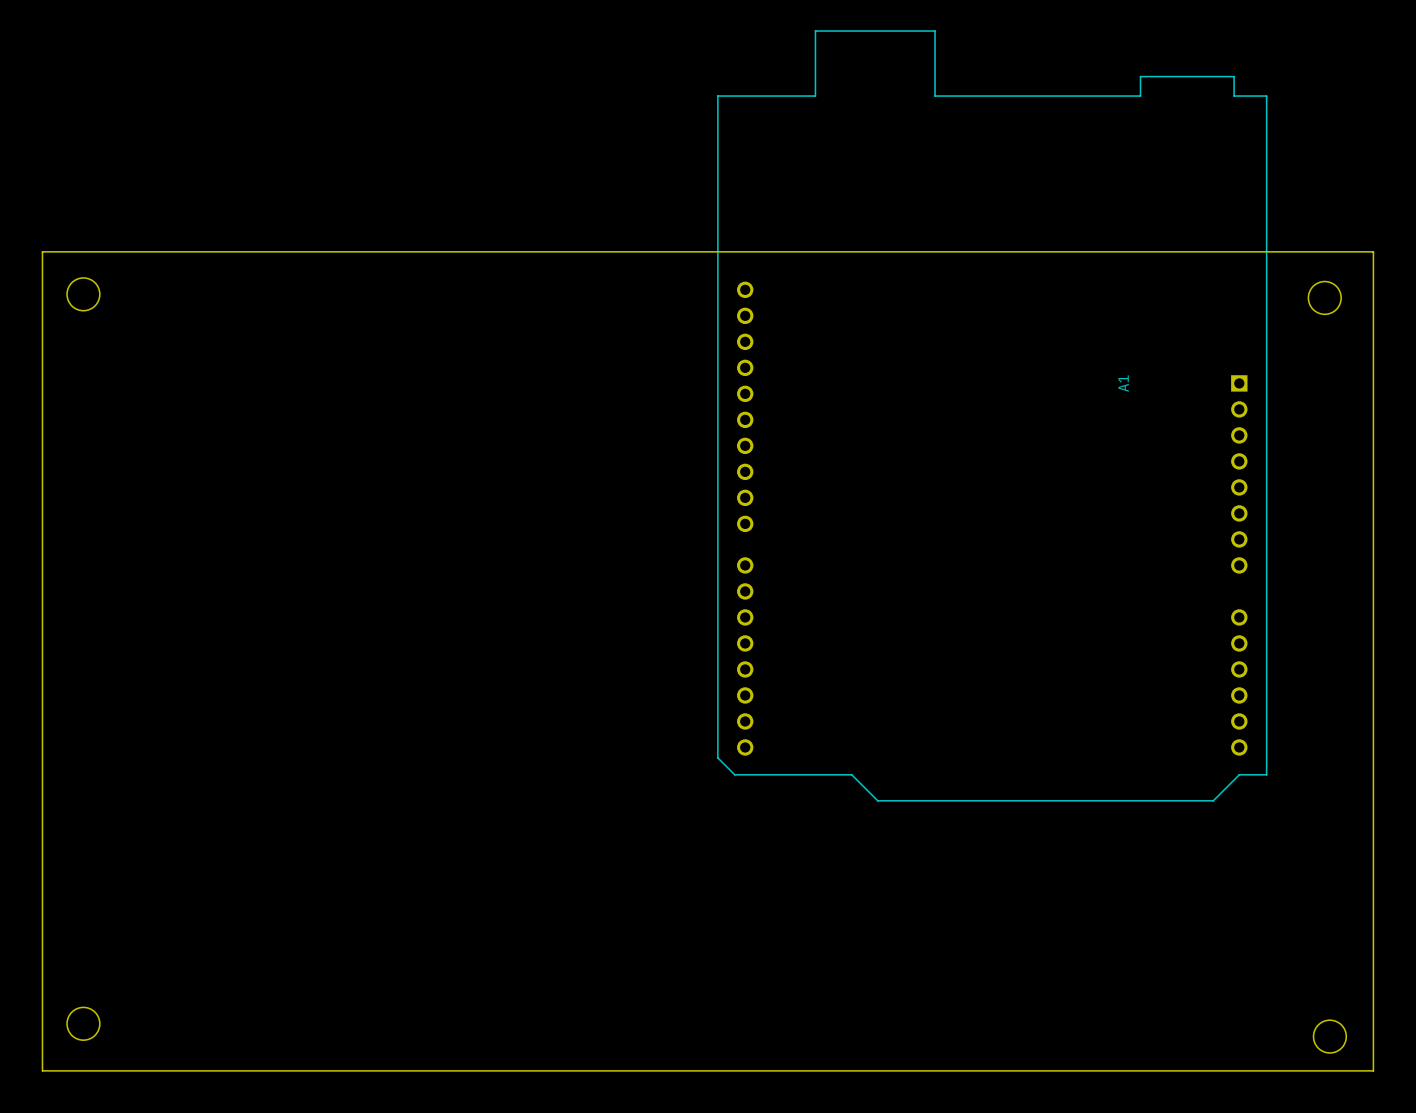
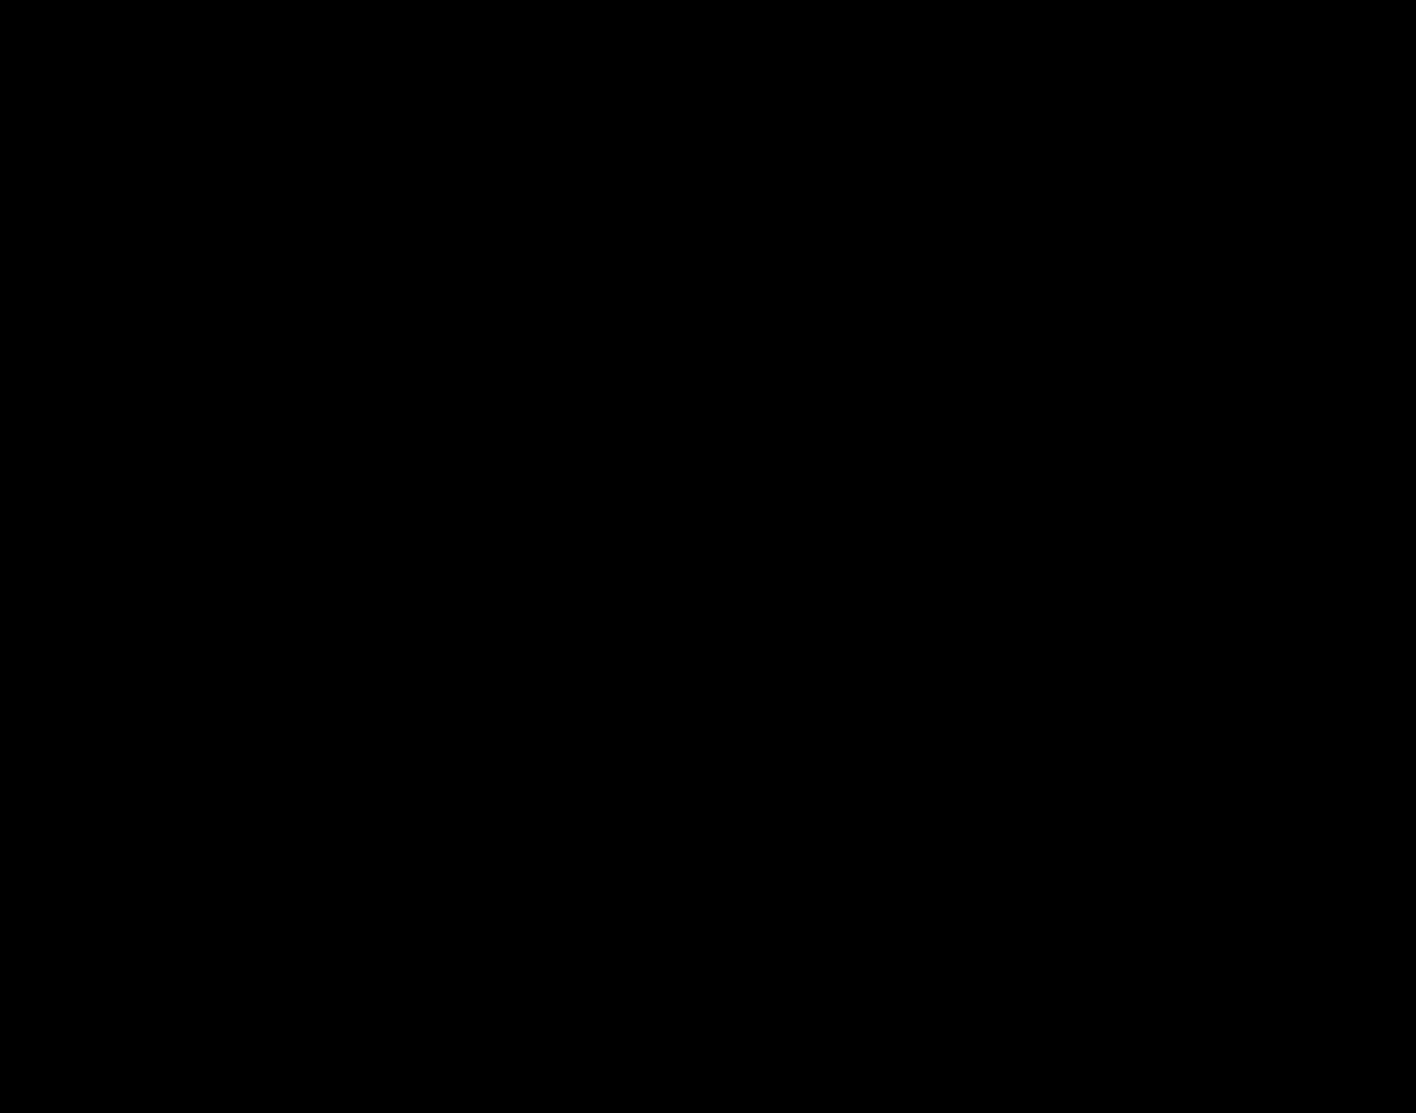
board edge: (42, 251) (1373, 251) (1373, 1070) (42, 1070) (42, 251) -> none
round board edge: [66, 277, 101, 311] -> none
round board edge: [1308, 281, 1342, 315] -> none
A1: (992, 415) -> none
round board edge: [66, 1007, 101, 1041] -> none
round board edge: [1313, 1019, 1347, 1054] -> none

